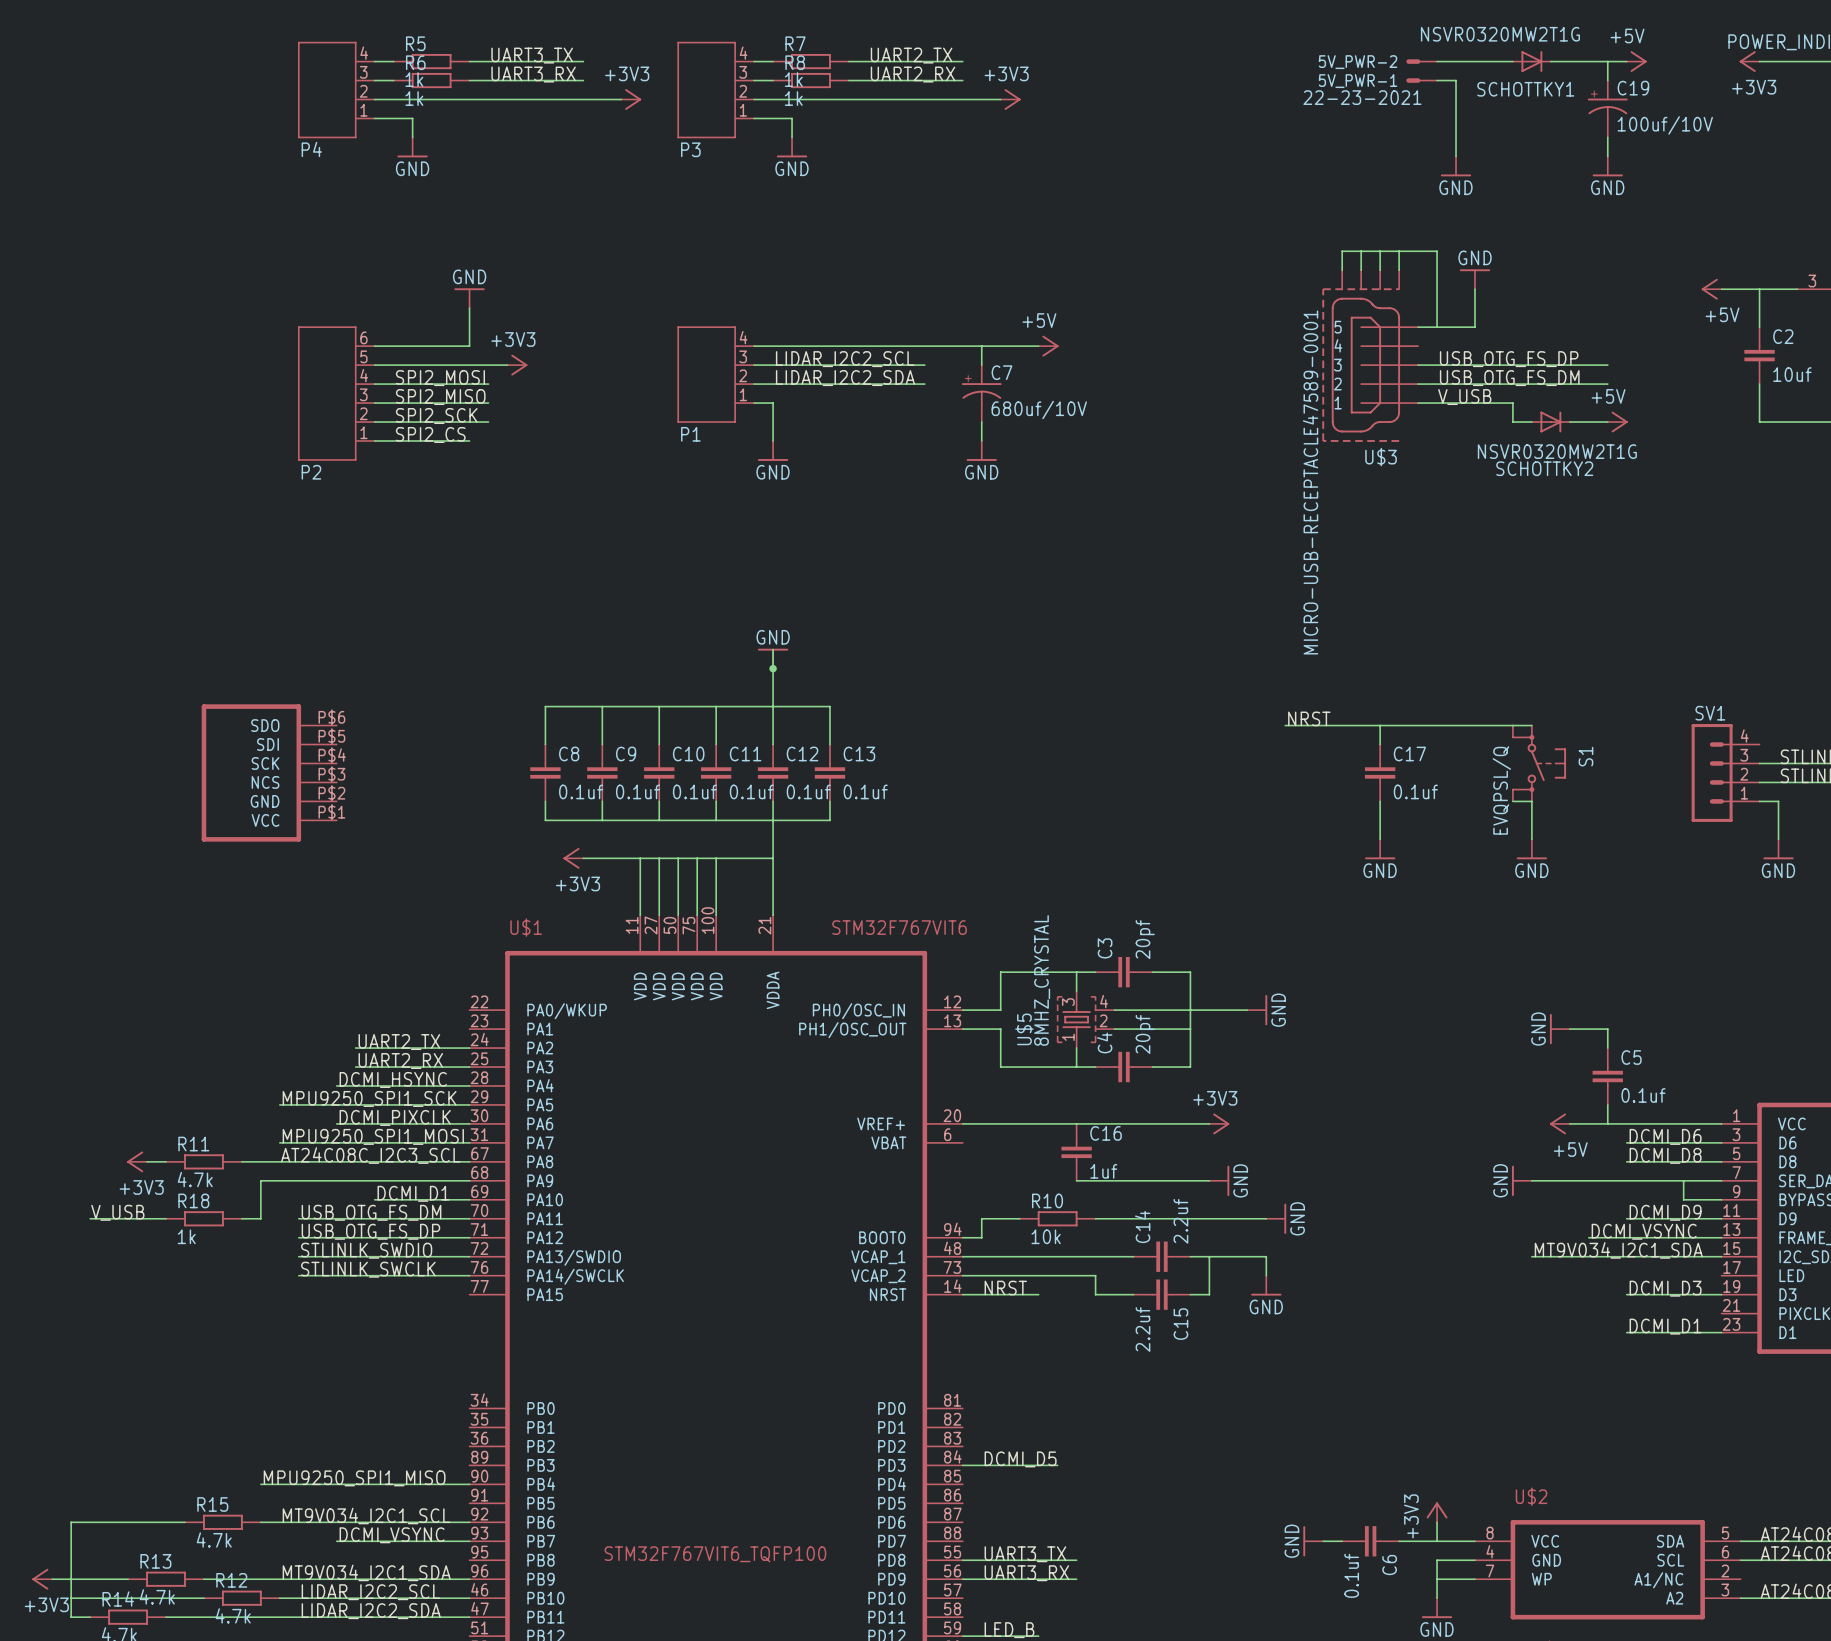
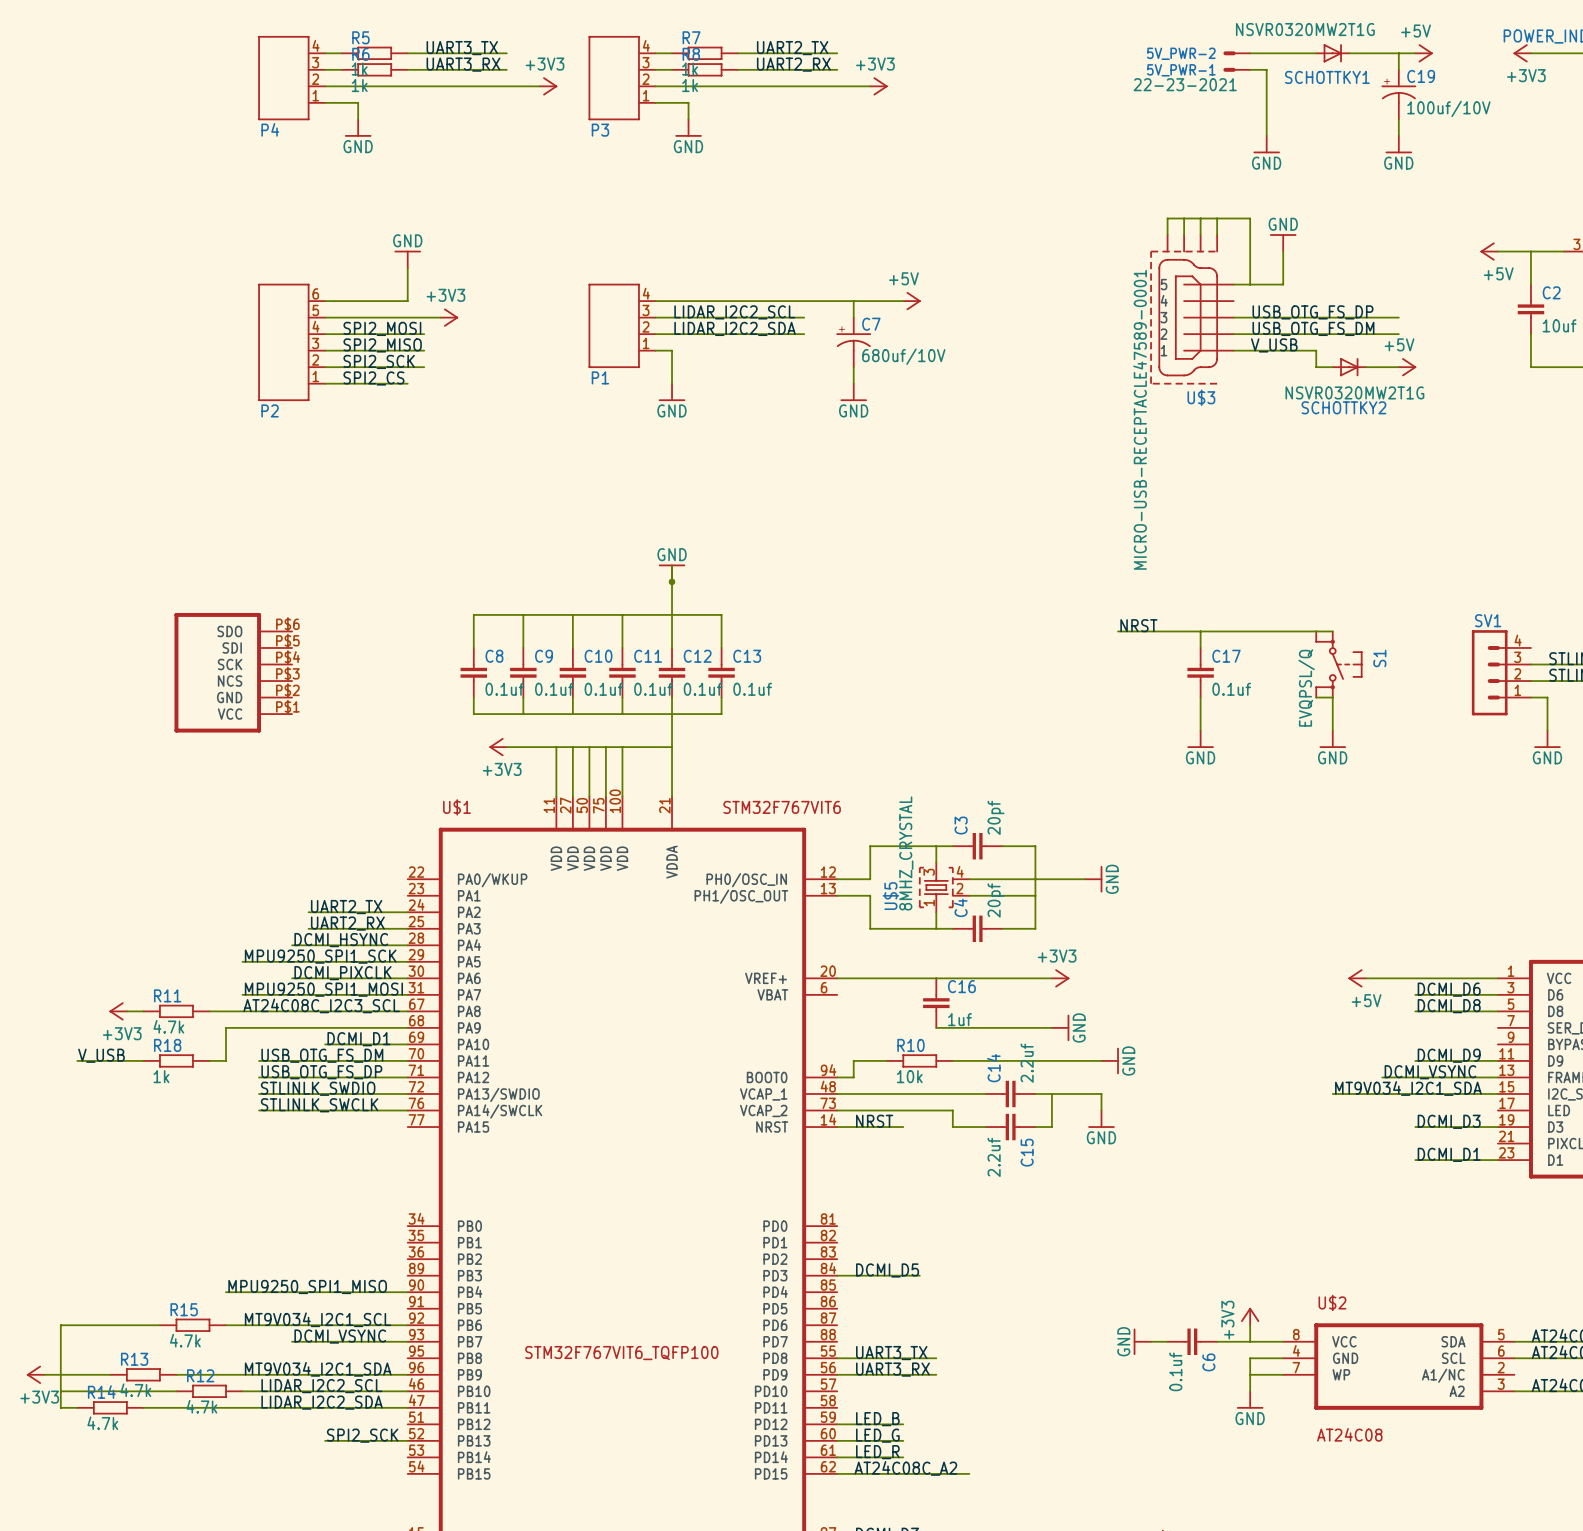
power symbol: GND (1559, 1029) -> none
wire: (1569, 1029) (1607, 1029) (1607, 1048) -> none
C5: 0.1uf (1607, 1076) -> none
wire: (1607, 1104) (1607, 1123) -> none
power symbol: GND (1521, 1180) -> none
wire: (1531, 1180) (1721, 1180) -> none
wire: (1683, 1180) (1683, 1199) (1721, 1199) -> none

